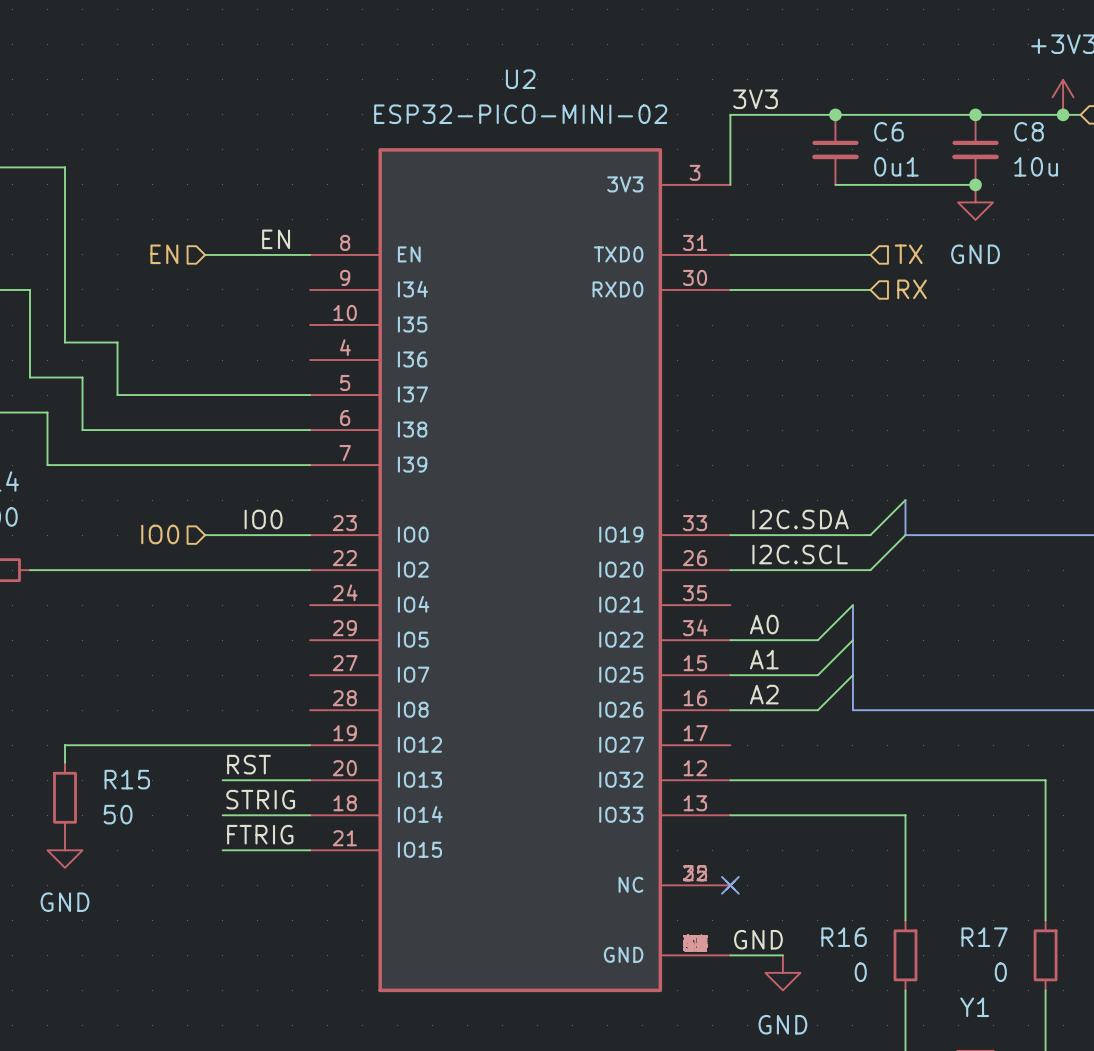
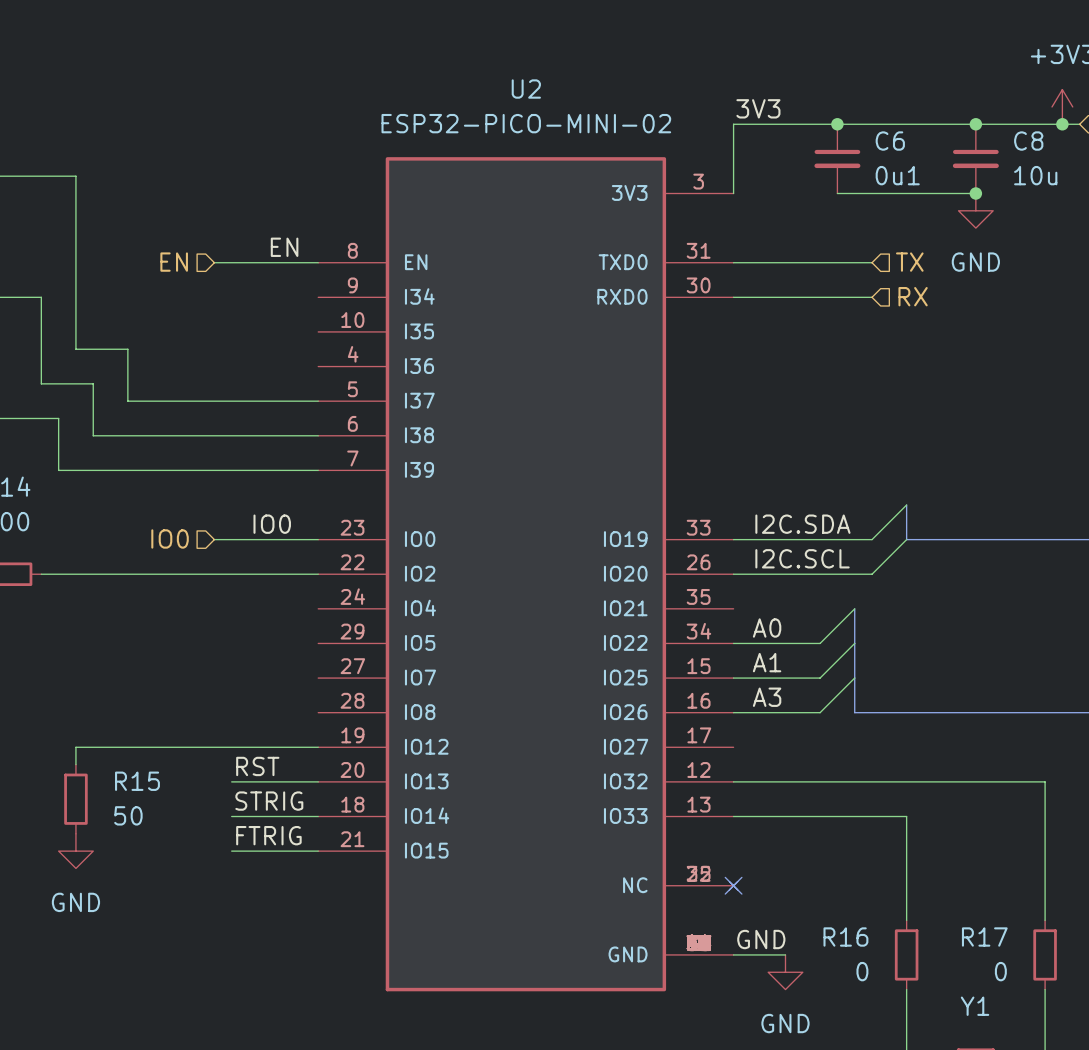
label: A2 (764, 694) -> A3 (767, 697)

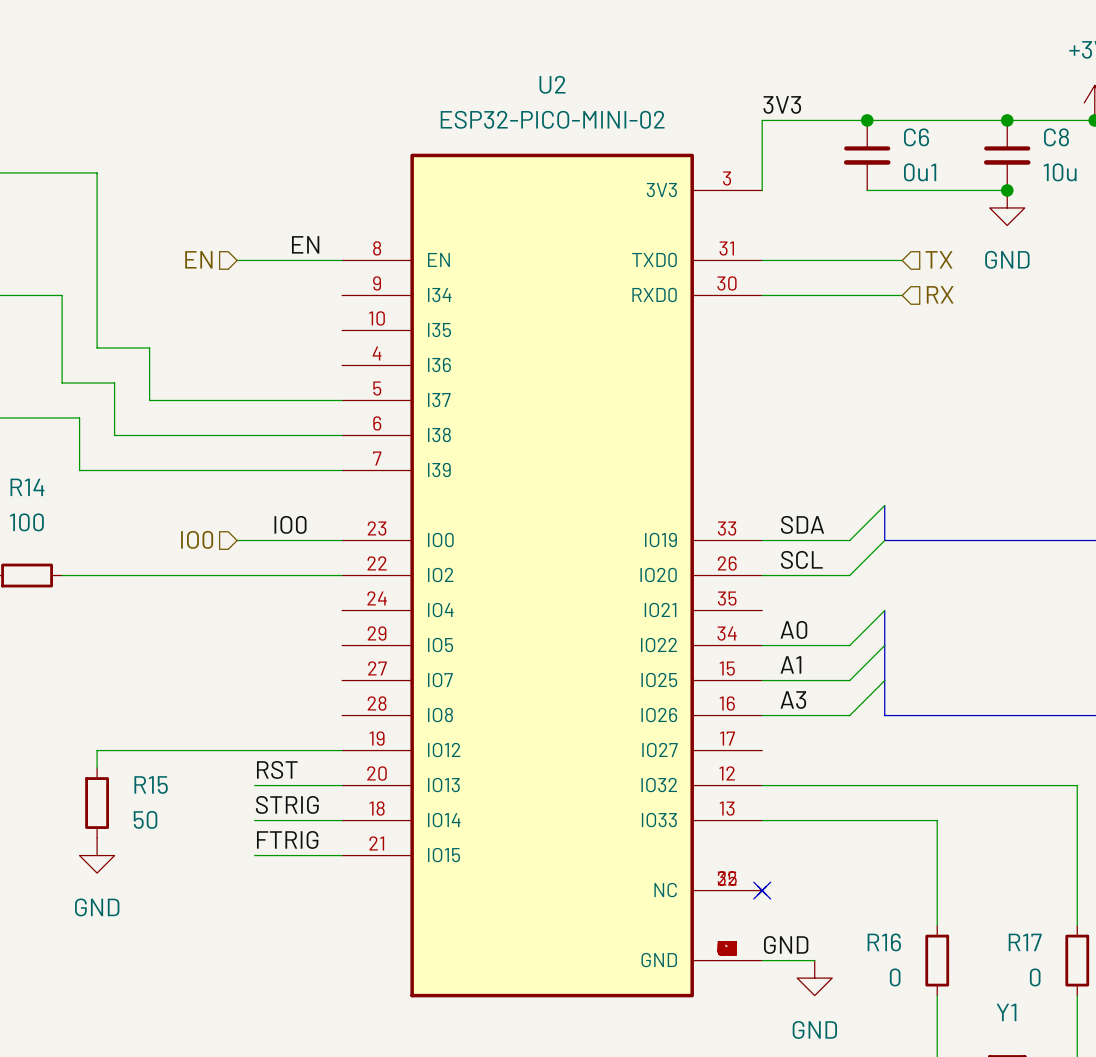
wire: (906, 505) (872, 539) (820, 539) -> (884, 505) (849, 540)
bus: (906, 505) (906, 539) -> (884, 505) (884, 540) (937, 540)
label: I2C.SDA (802, 524) -> SDA (802, 524)
wire: (906, 539) (872, 574) (820, 574) -> (884, 540) (849, 575)
label: I2C.SCL (802, 558) -> SCL (801, 559)

